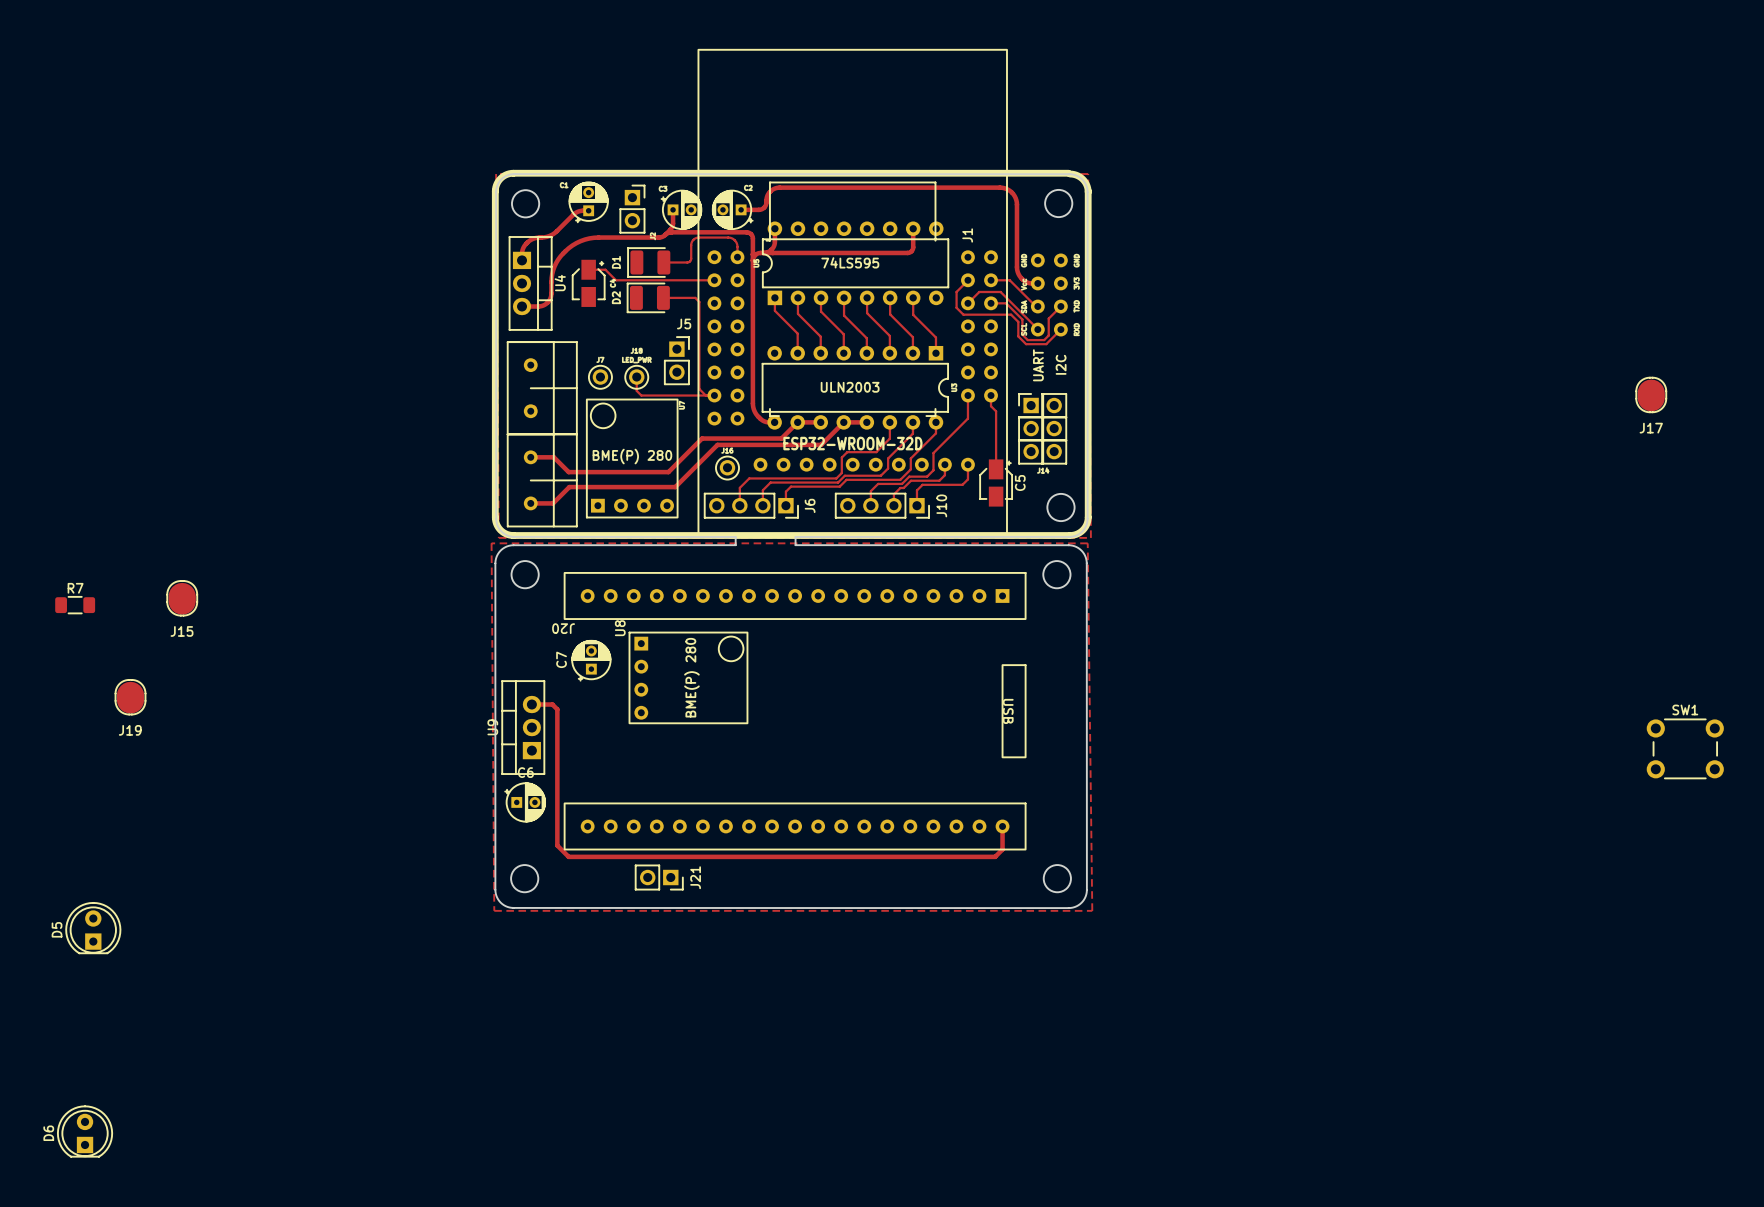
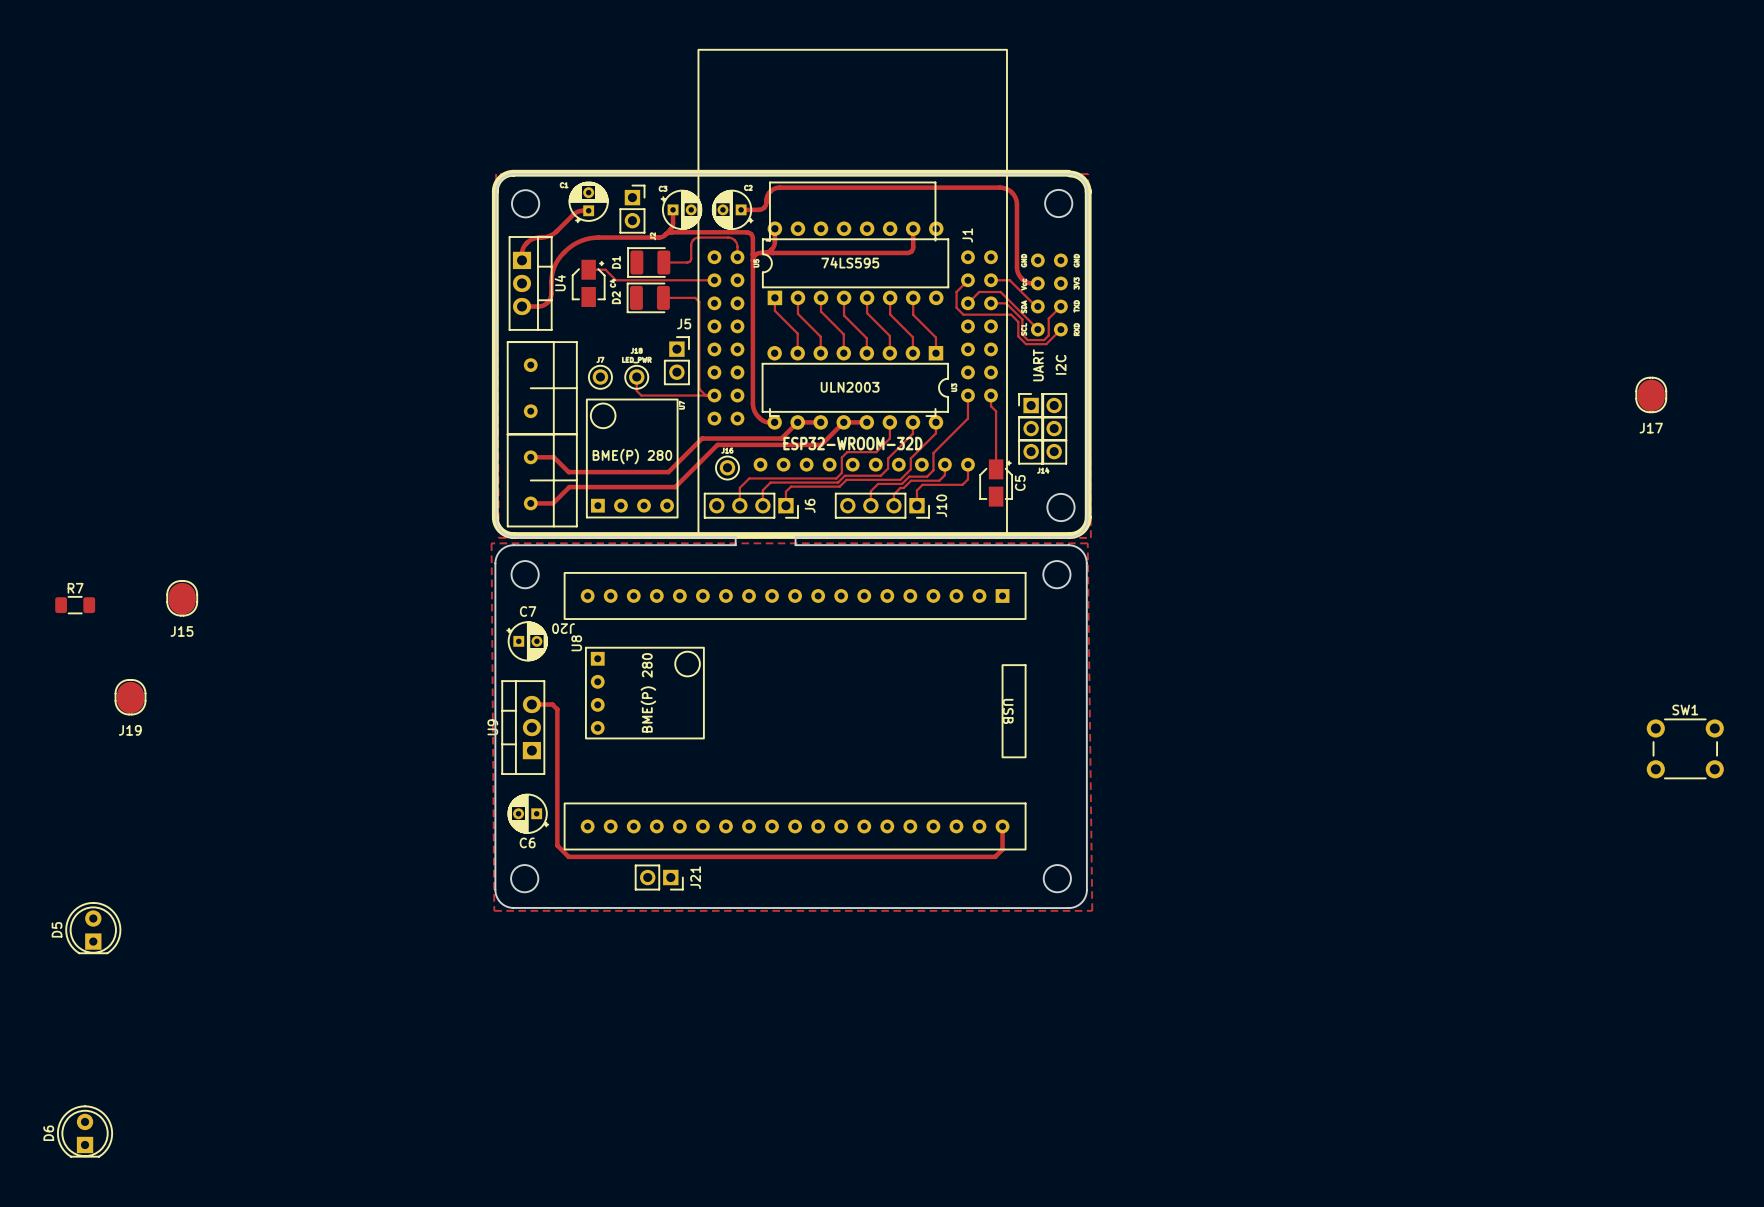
C7 rotation: 0° (591, 660) -> 90° clockwise (527, 641)
C7 position: (591, 660) -> (527, 641)
U8 position: (688, 677) -> (644, 693)
C6 rotation: 0° (525, 802) -> 180° (528, 813)

